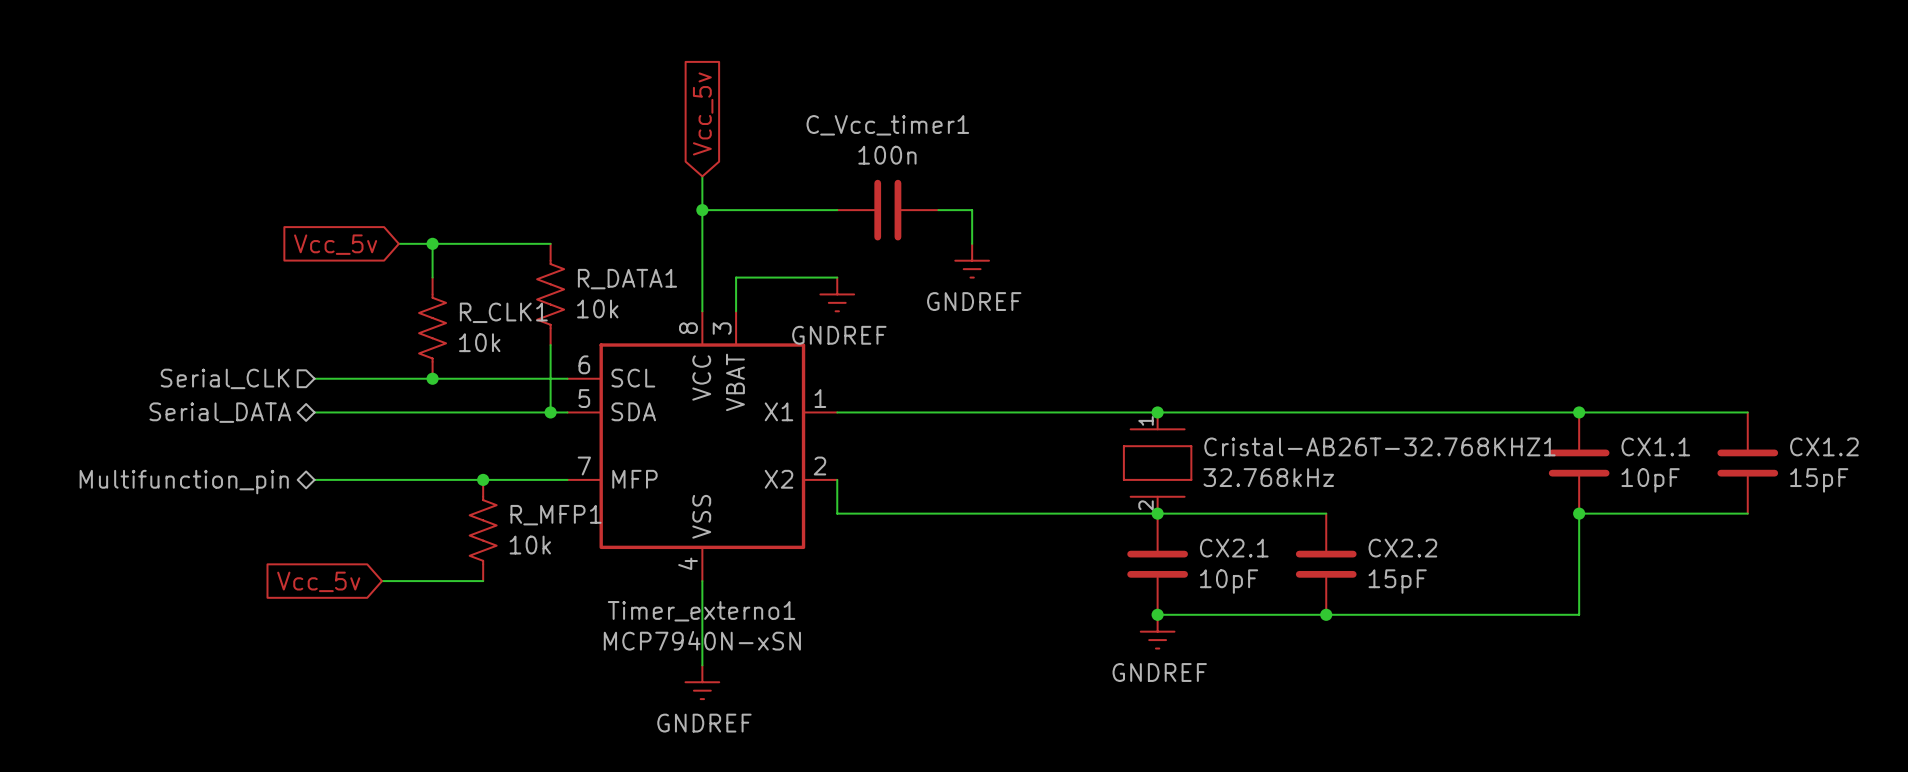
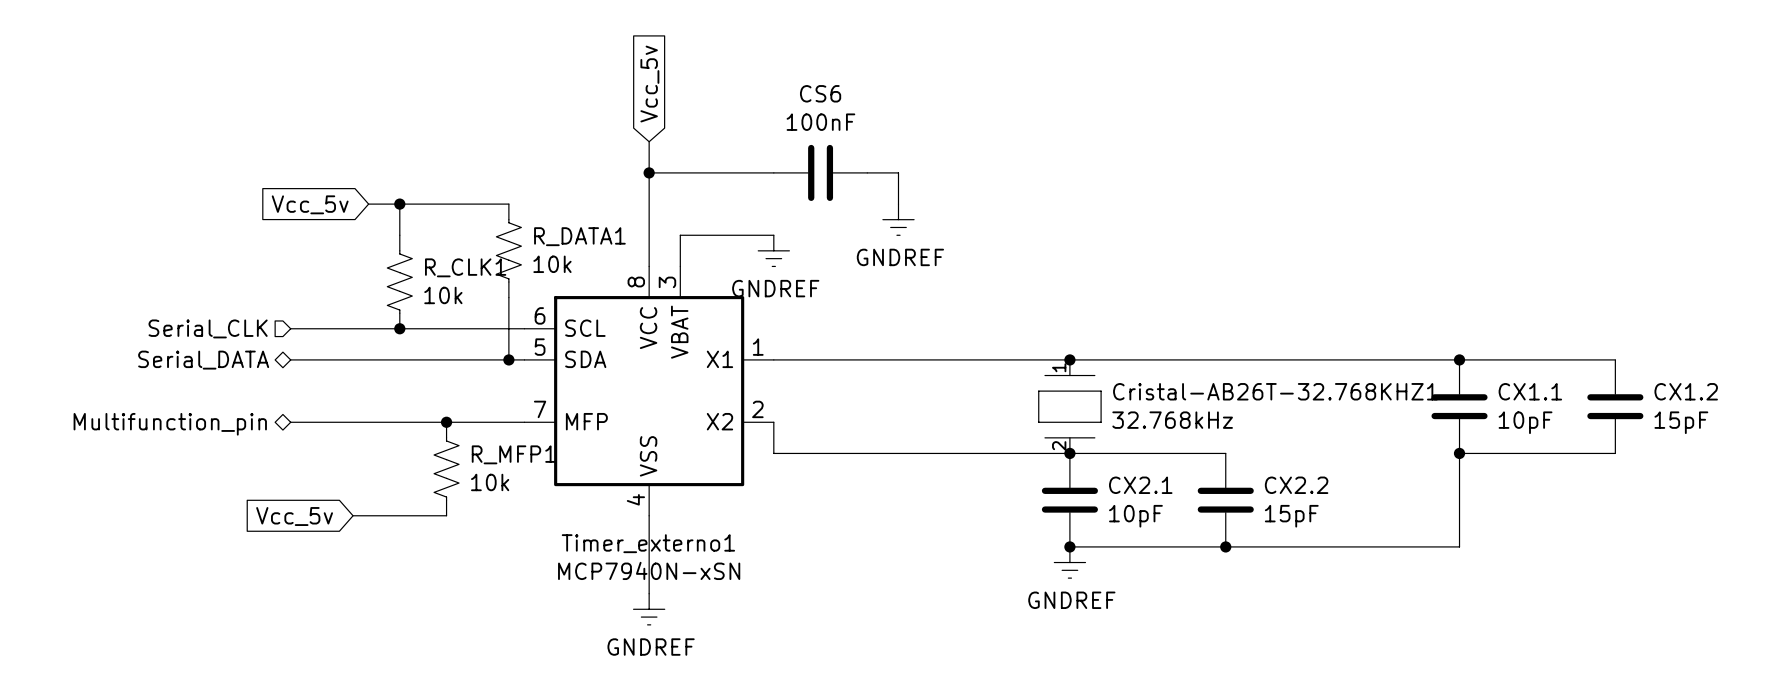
C_Vcc_timer1 name: C_Vcc_timer1 (887, 125) -> CS6 (820, 93)
C_Vcc_timer1 value: 100n (887, 155) -> 100nF (820, 122)

